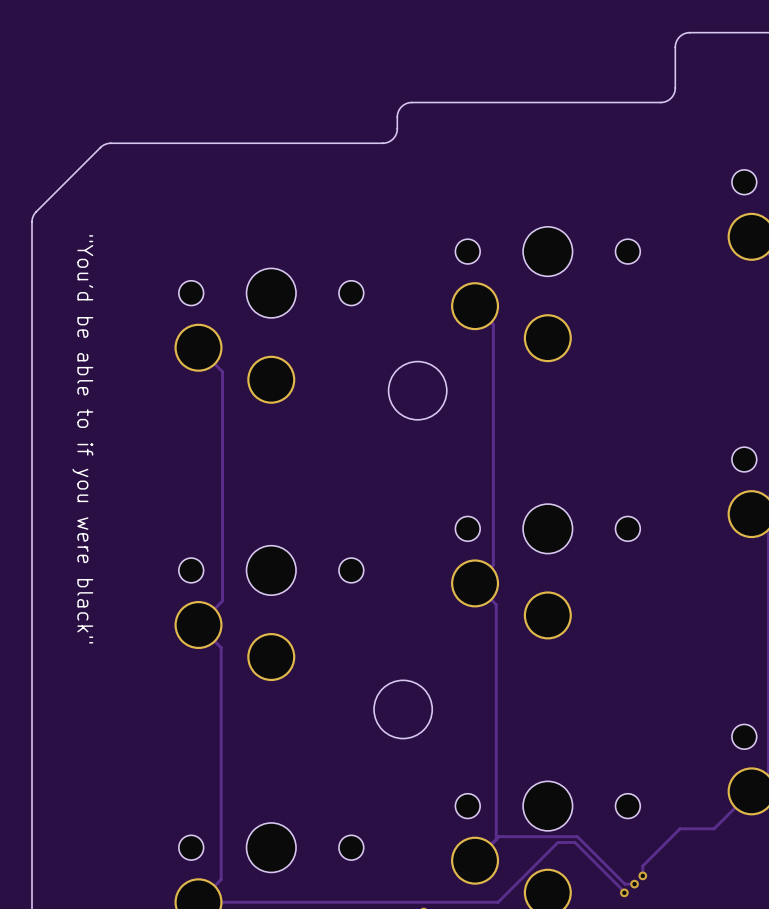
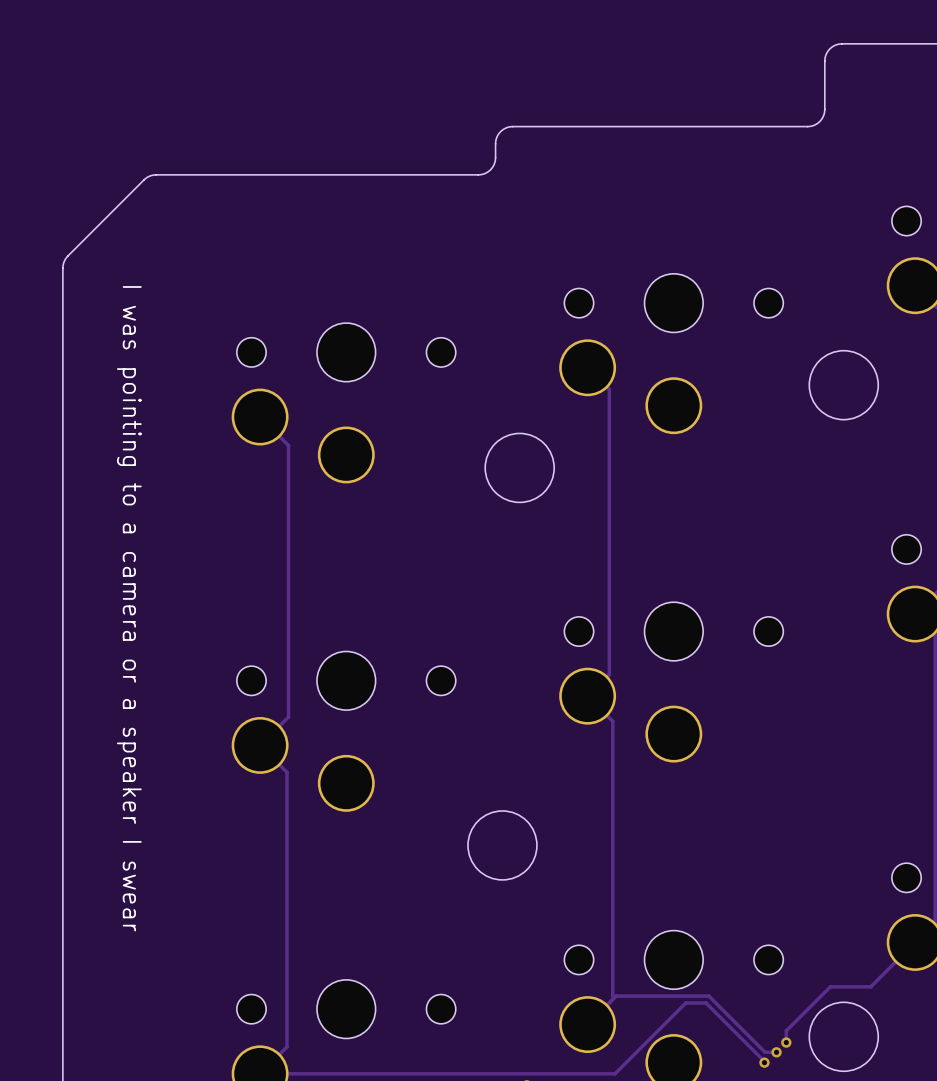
round board edge: none -> [808, 350, 879, 421]
text: "You'd be able to if you were black" (82, 439) -> I was pointing to a camera or a speaker I swear (129, 608)
round board edge: none -> [808, 1001, 879, 1072]

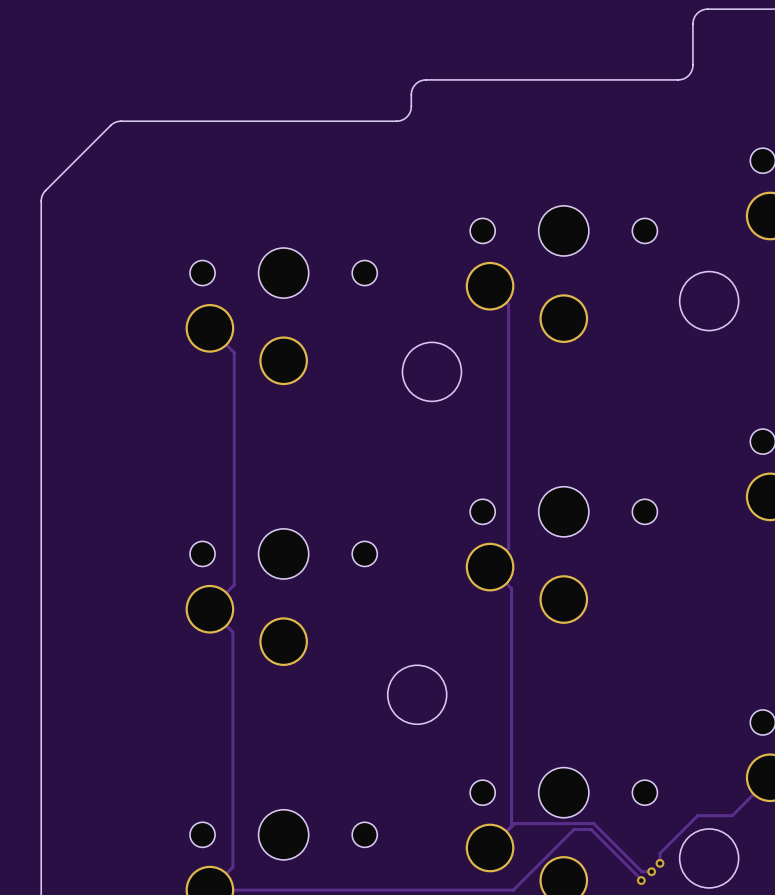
text: I was pointing to a camera or a speaker I swear (129, 608) -> none

